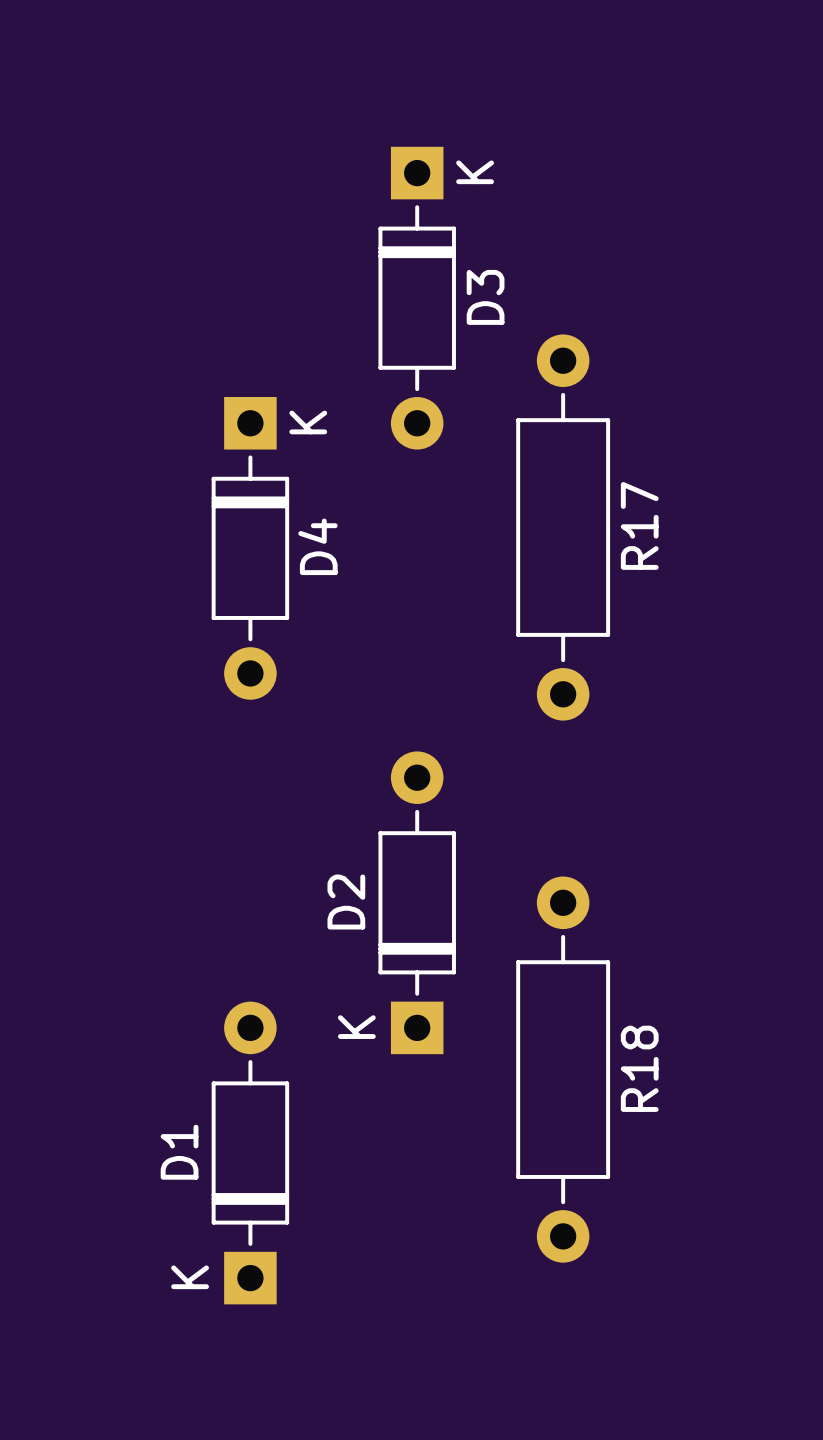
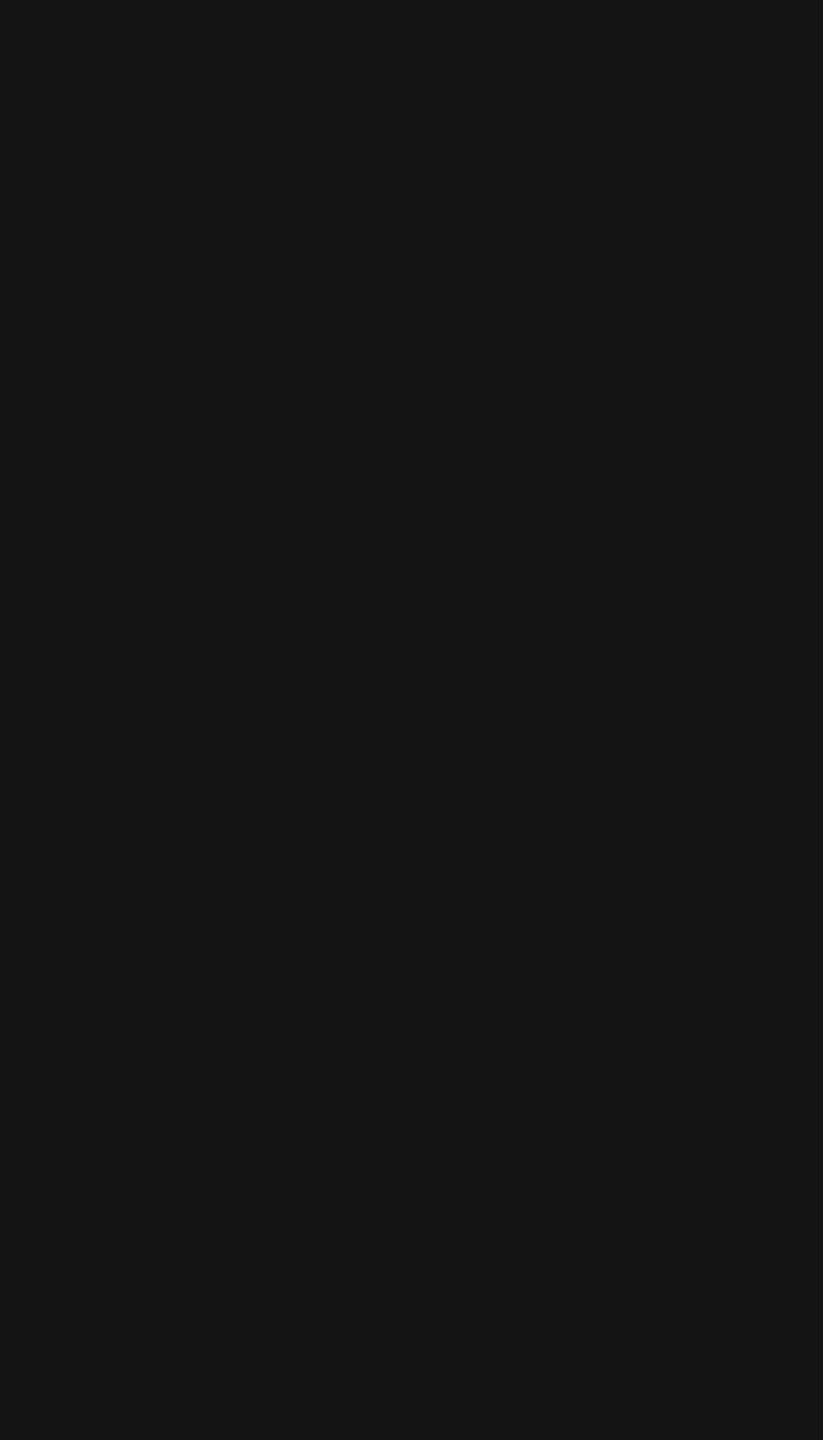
D3: (417, 298) -> none
R17: (563, 527) -> none
D4: (250, 548) -> none
D2: (417, 902) -> none
R18: (563, 1069) -> none
D1: (250, 1152) -> none

